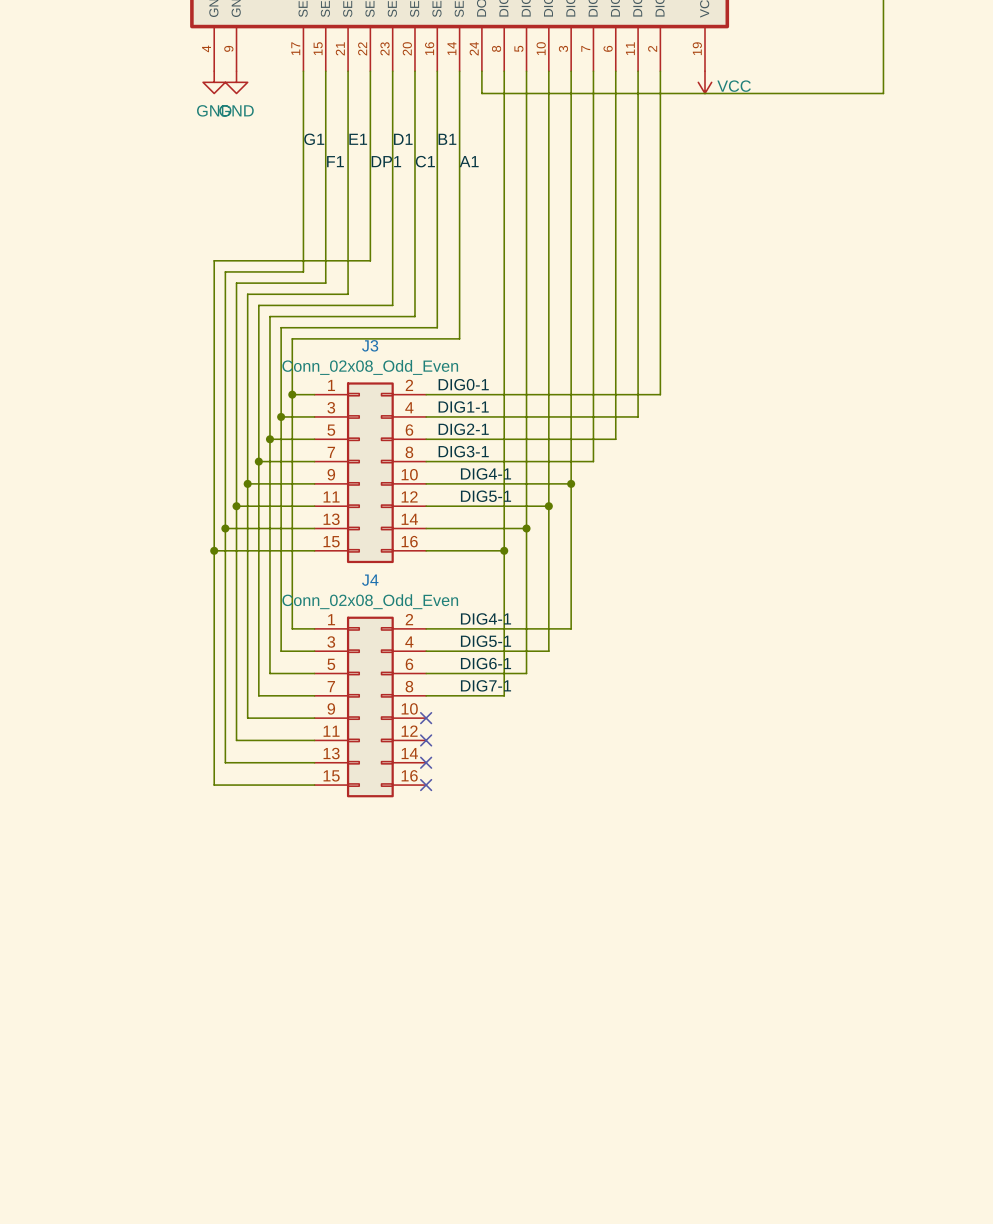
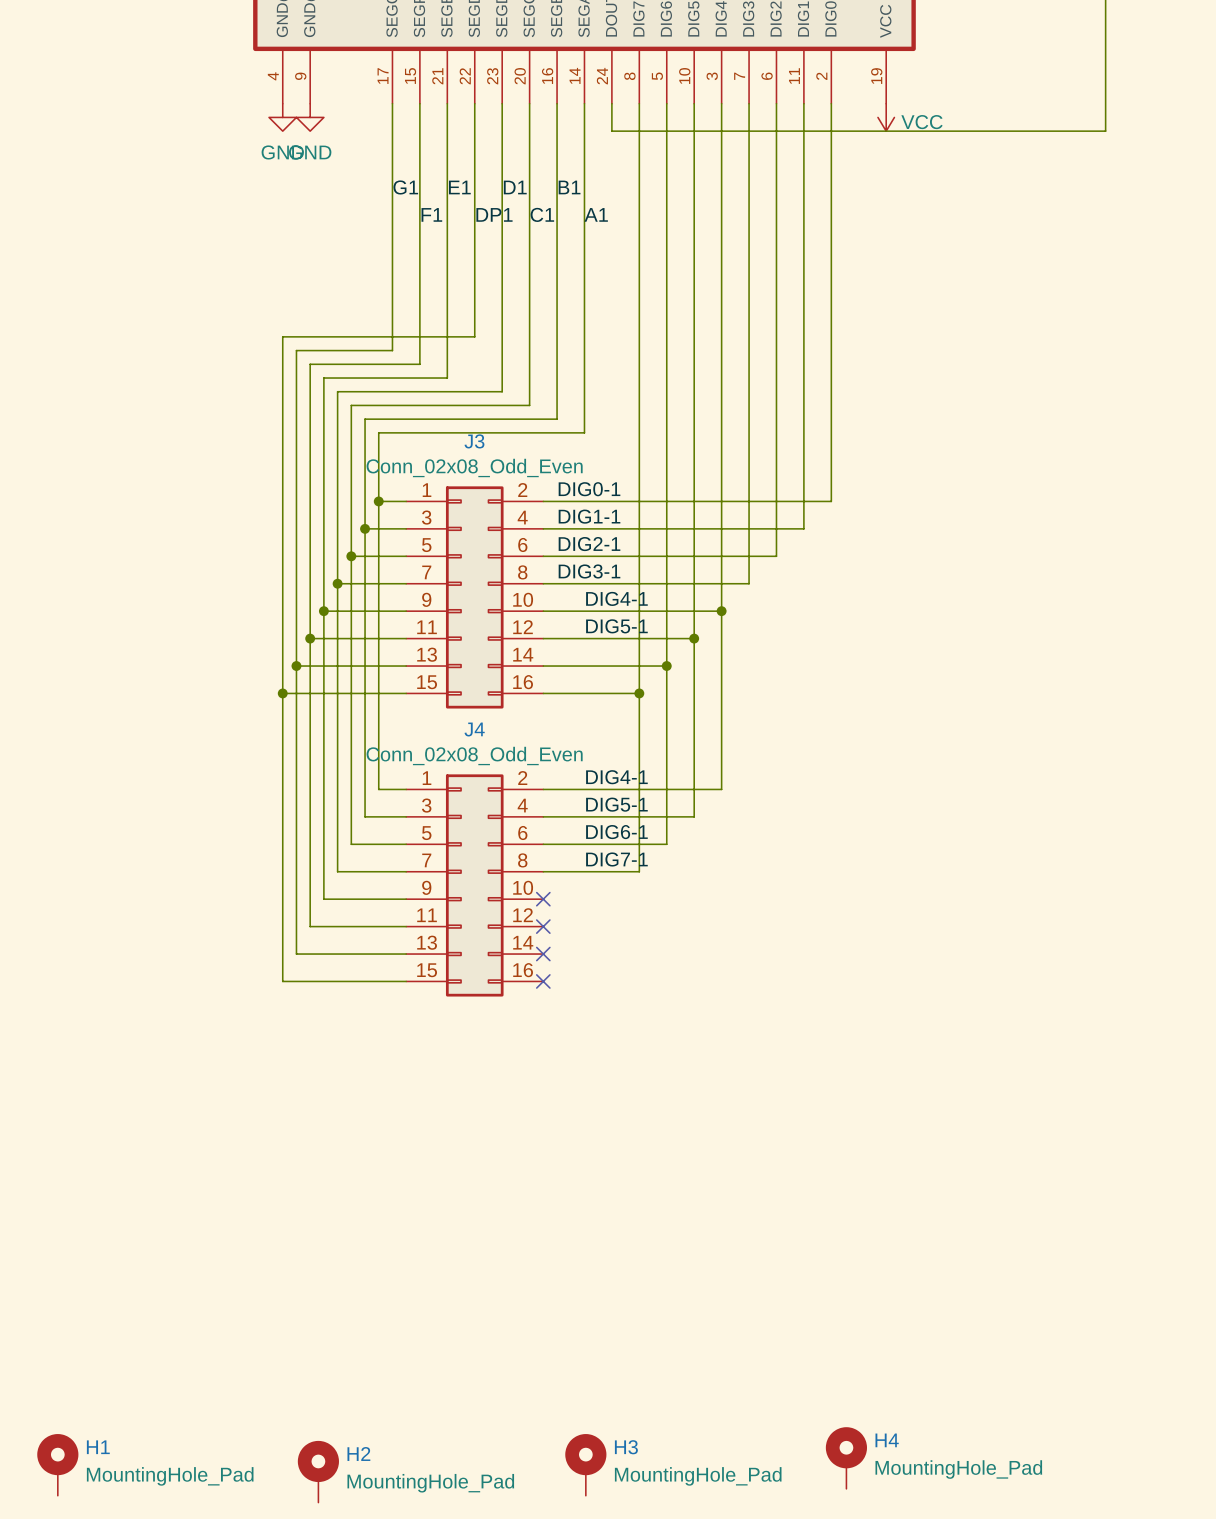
H4: none -> MountingHole_Pad (846, 1458)
H1: none -> MountingHole_Pad (57, 1464)
H3: none -> MountingHole_Pad (585, 1464)
H2: none -> MountingHole_Pad (318, 1471)

